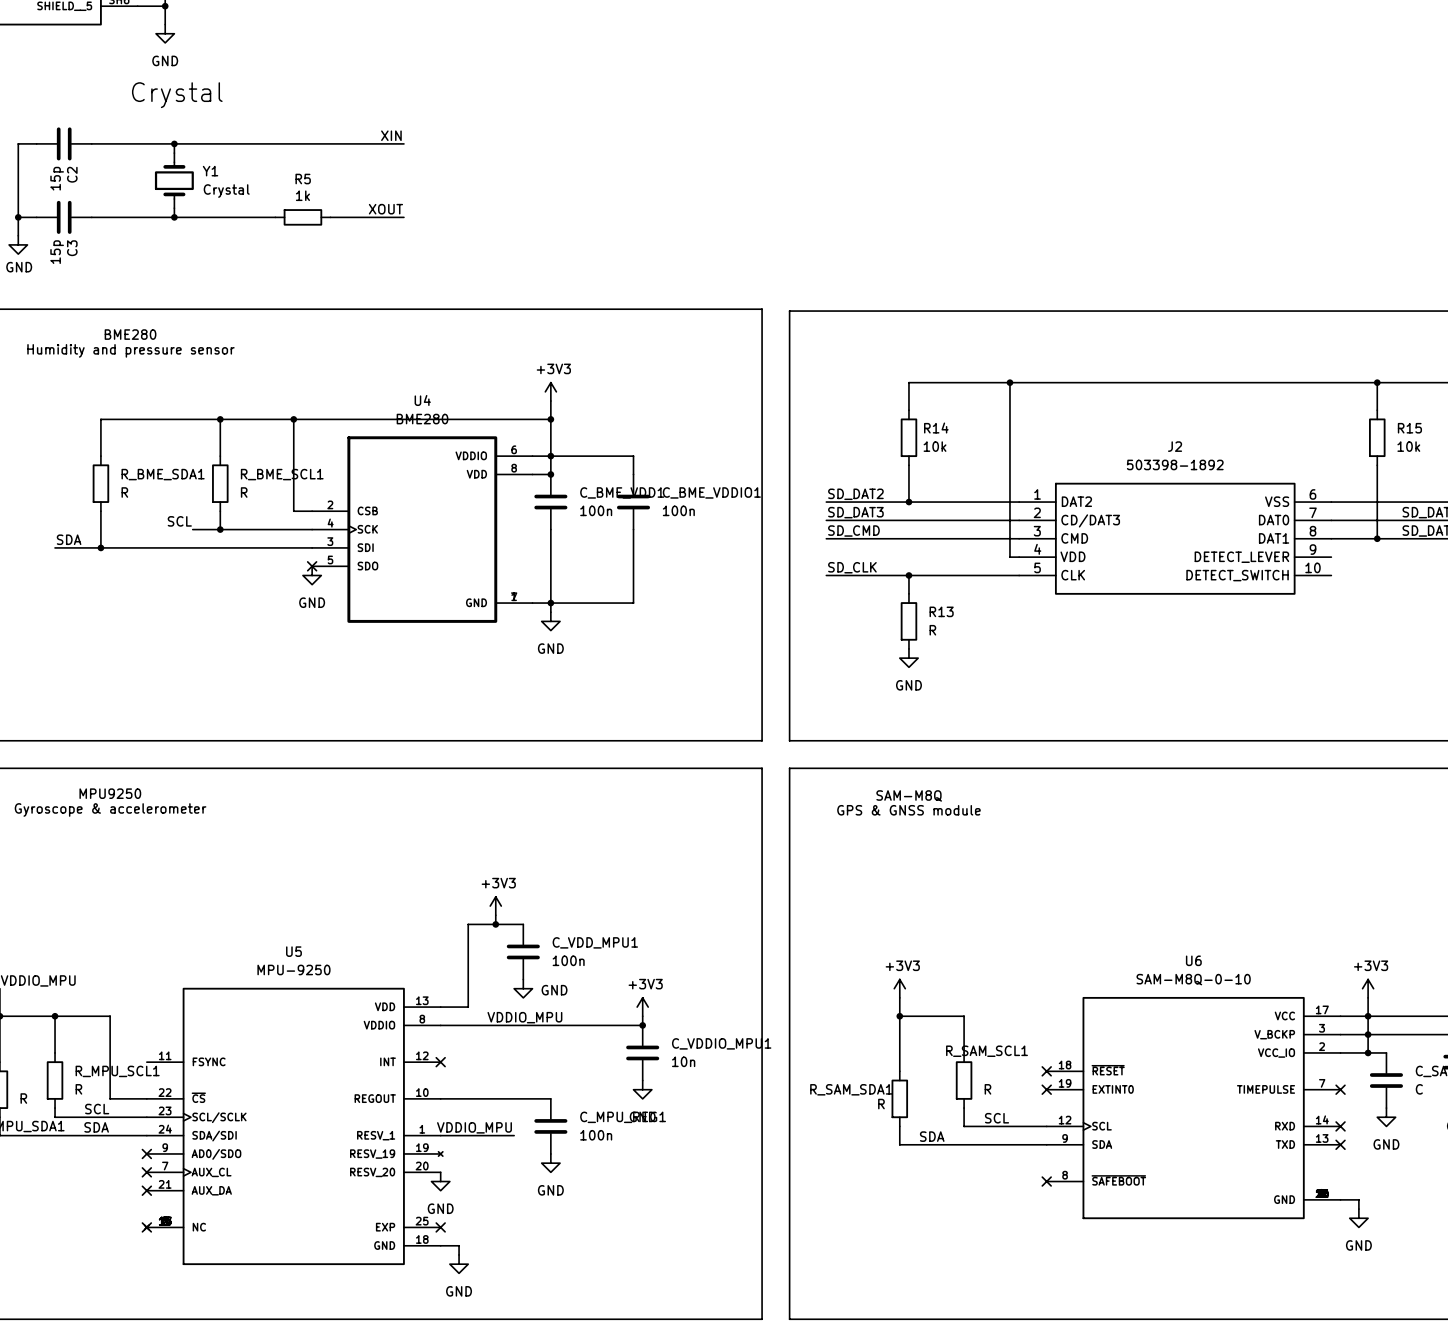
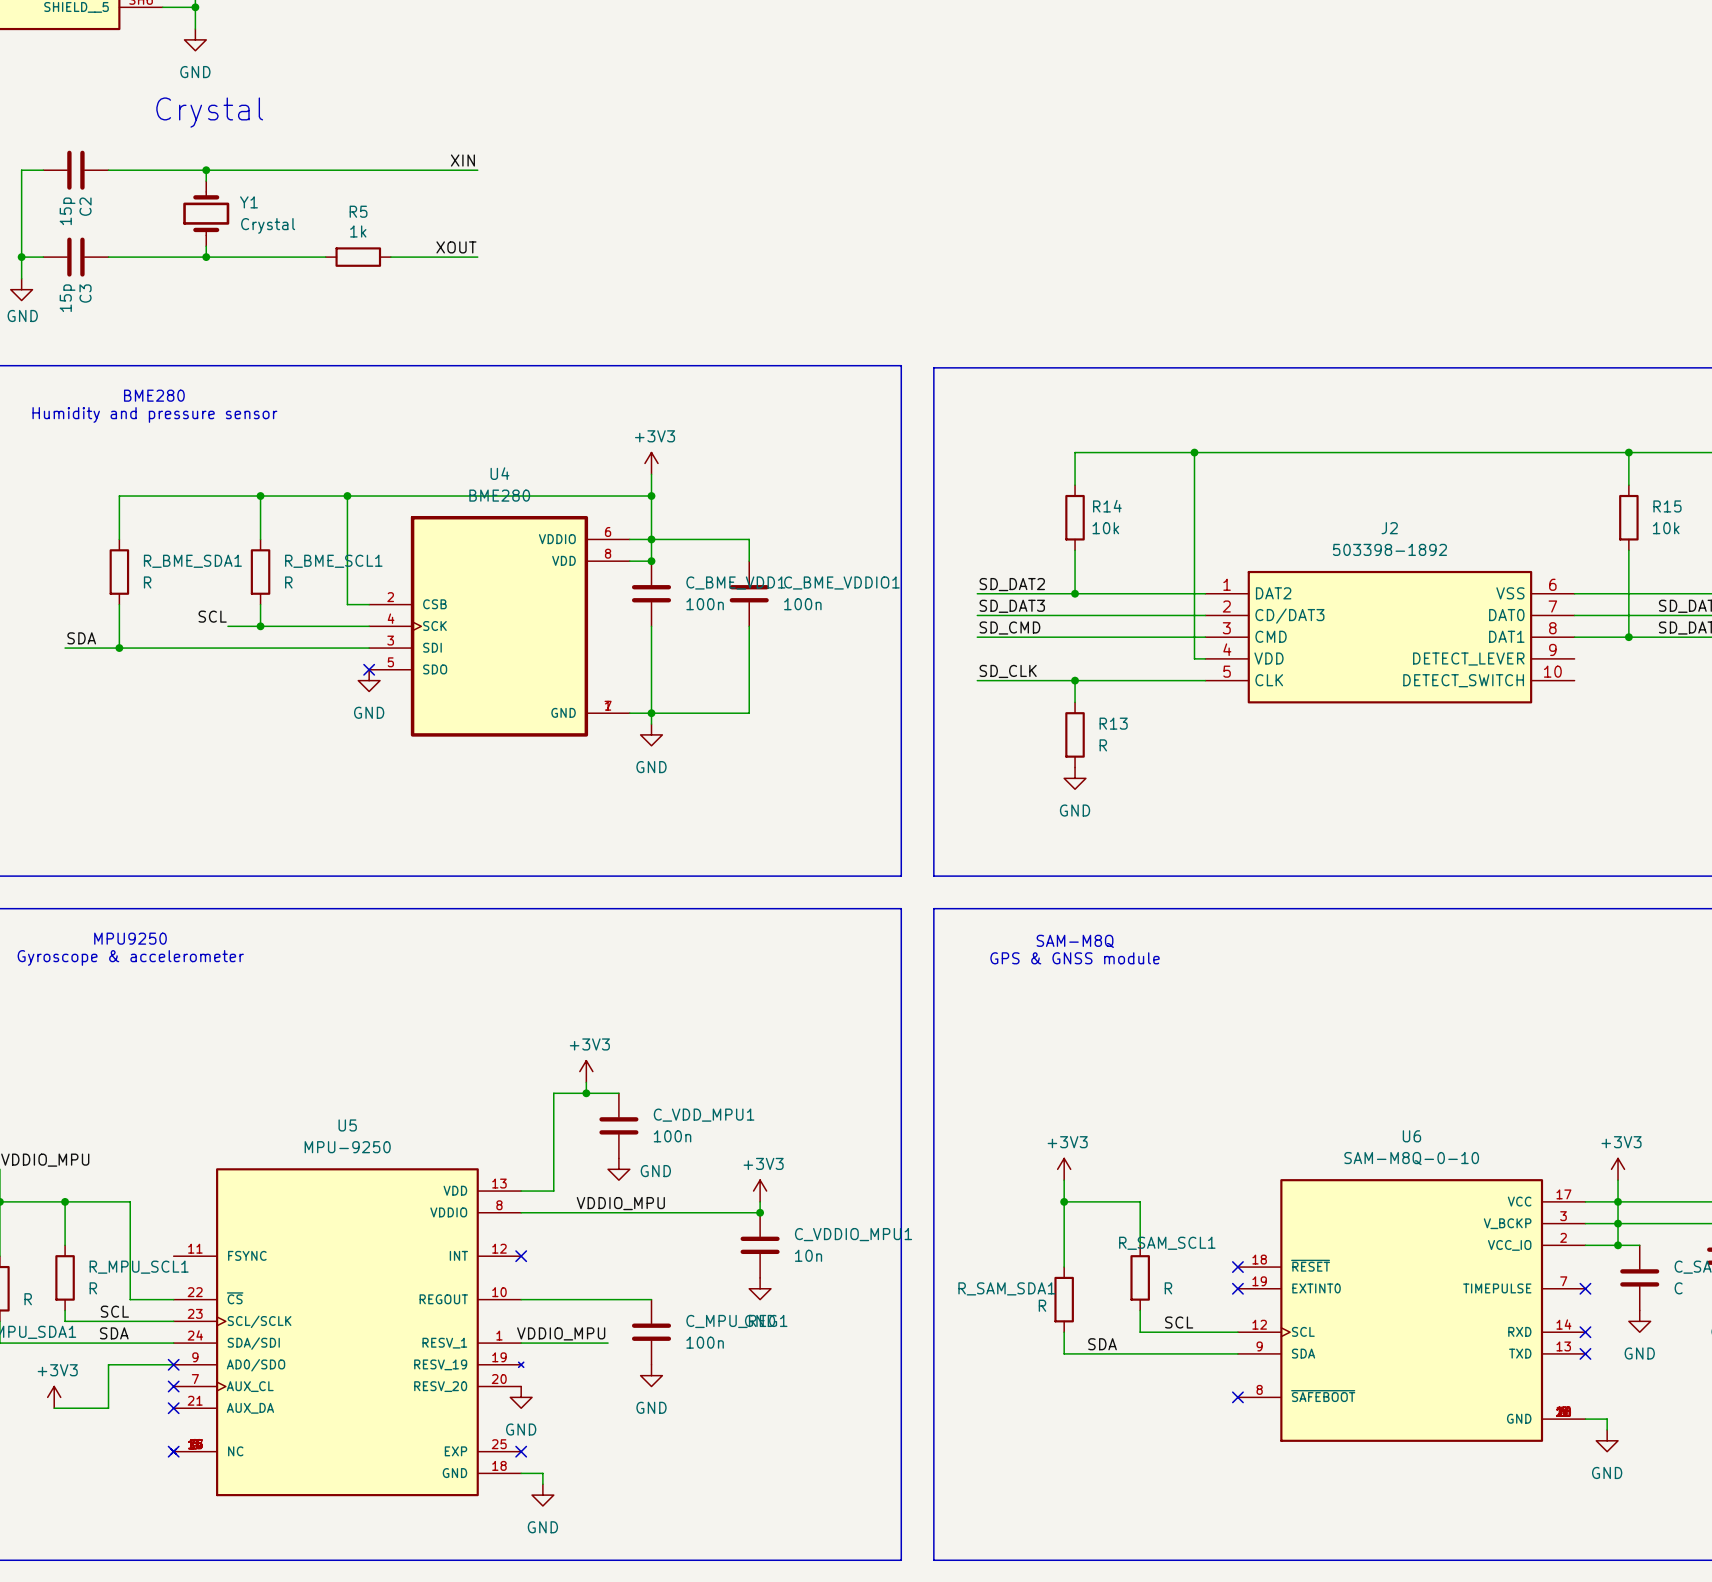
wire: none -> (173, 1364) (108, 1364) (108, 1408) (54, 1408)
power symbol: none -> +3V3 (54, 1397)

